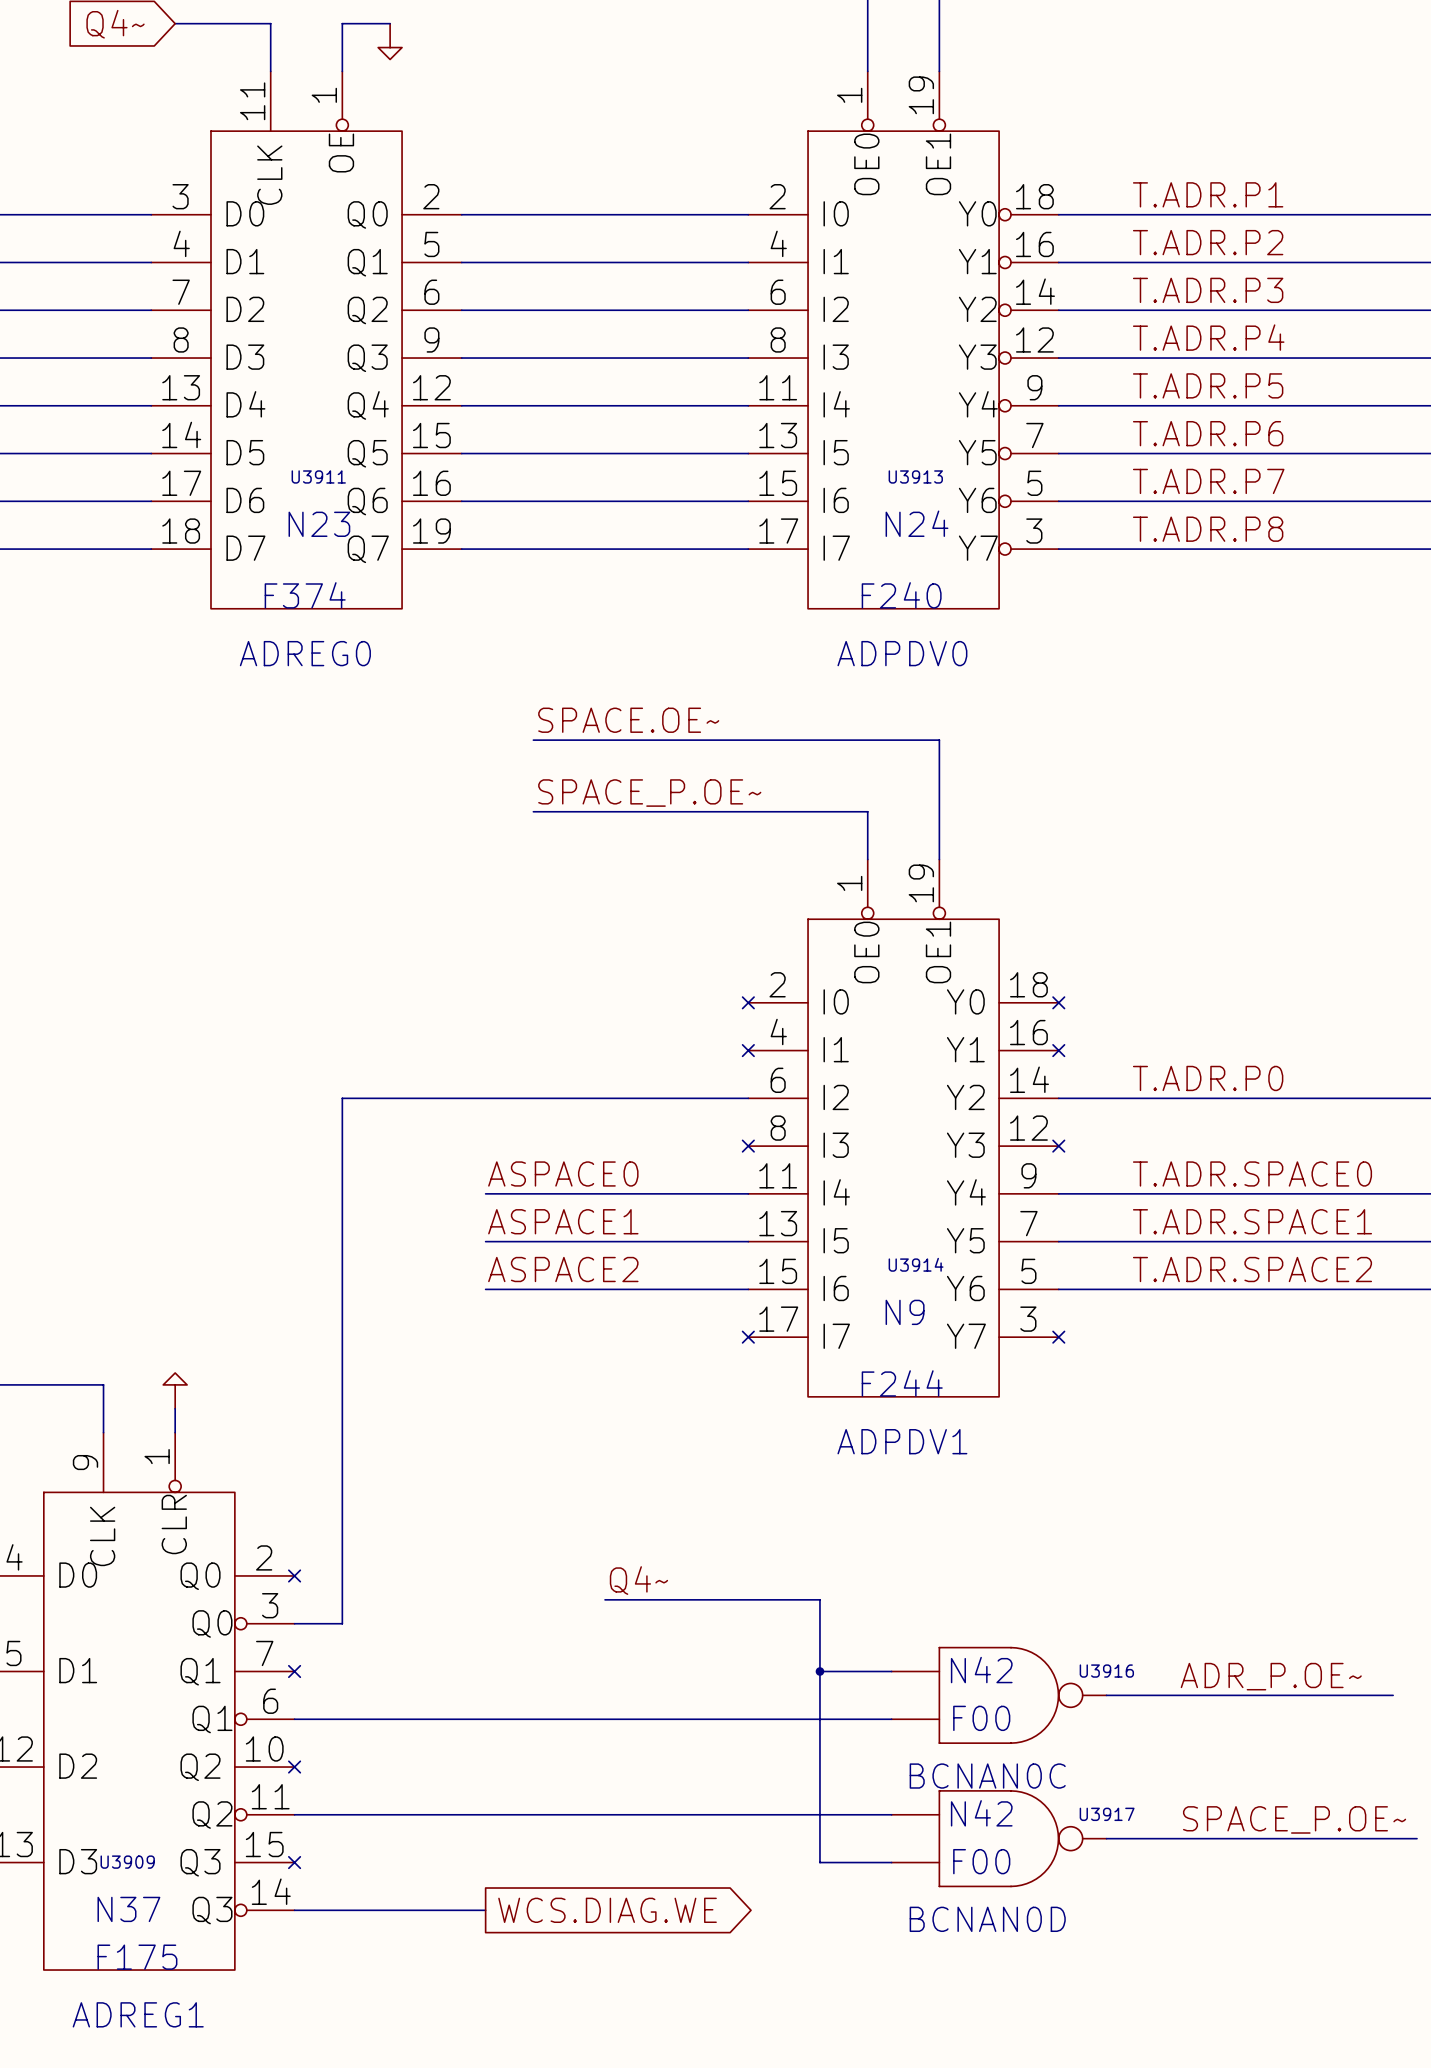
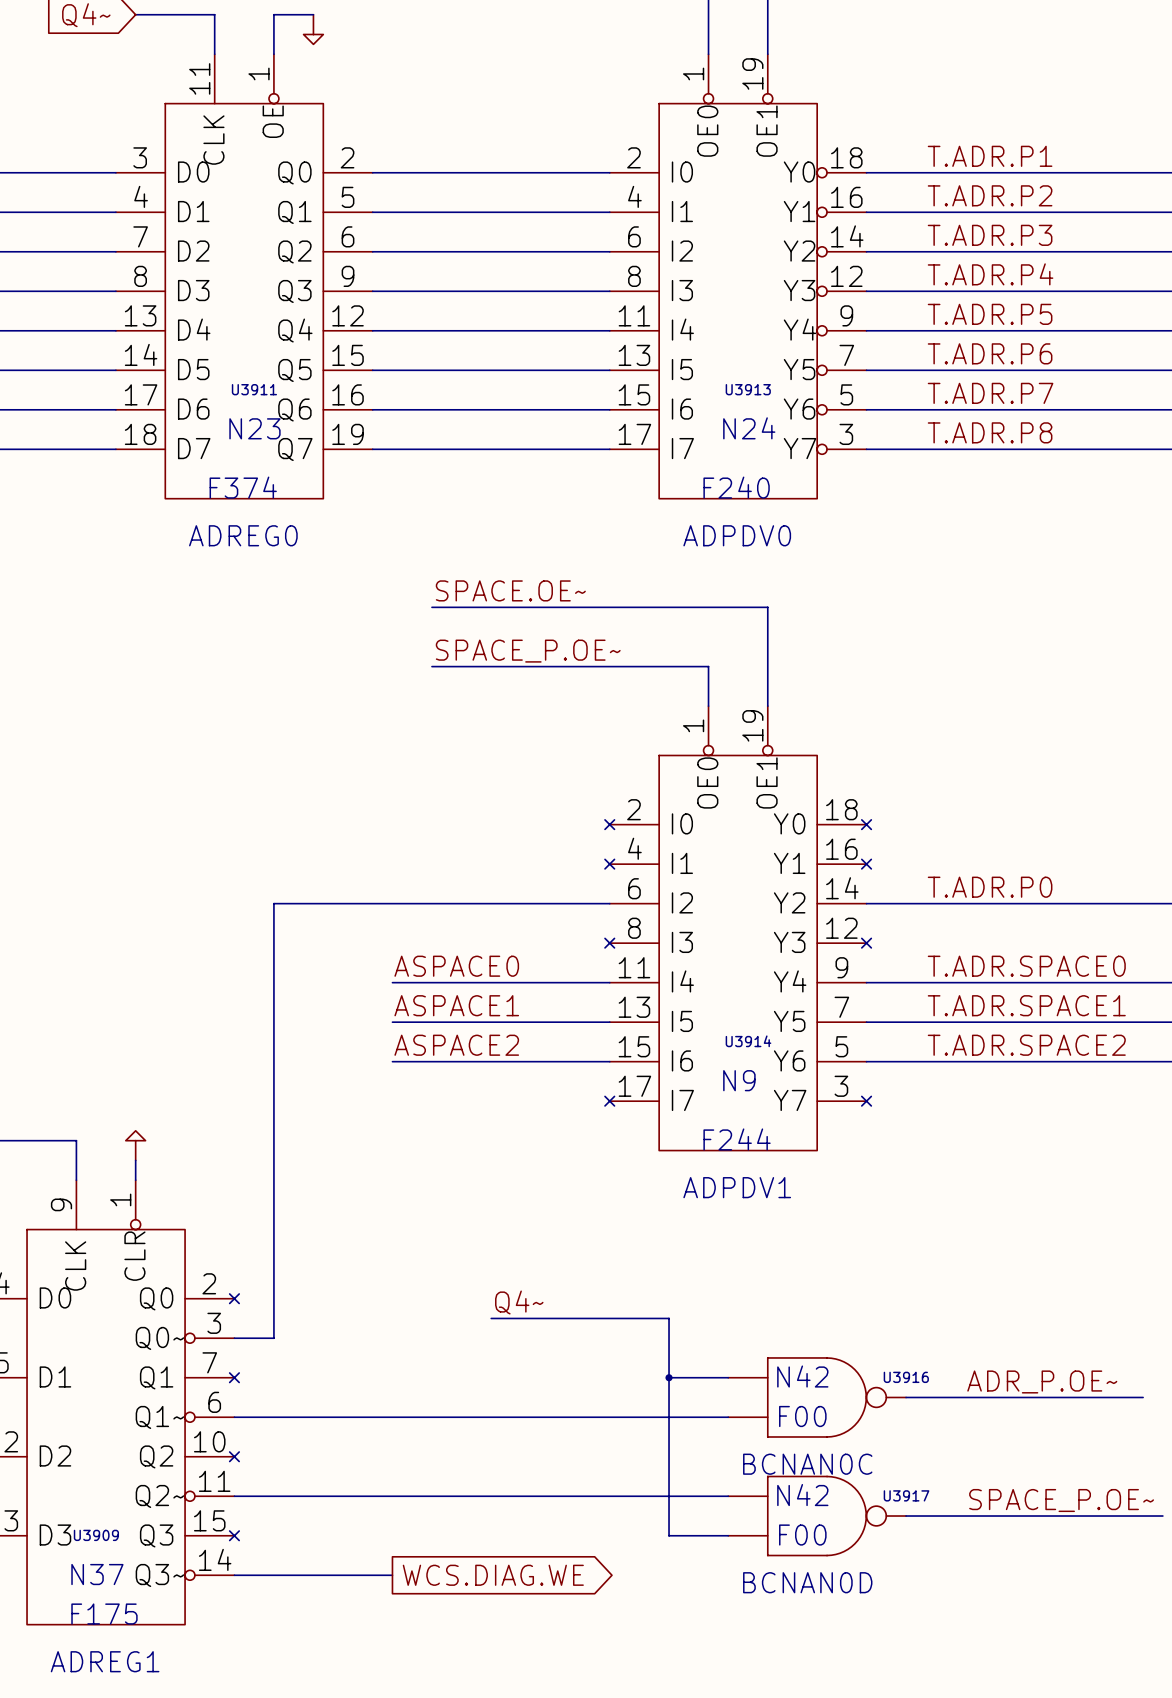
U3909 pin name: Q0 (212, 1623) -> Q0~ (159, 1338)
U3909 pin name: Q1 (212, 1719) -> Q1~ (159, 1417)
U3909 pin name: Q2 (212, 1815) -> Q2~ (159, 1496)
U3909 pin name: Q3 (212, 1910) -> Q3~ (159, 1575)

